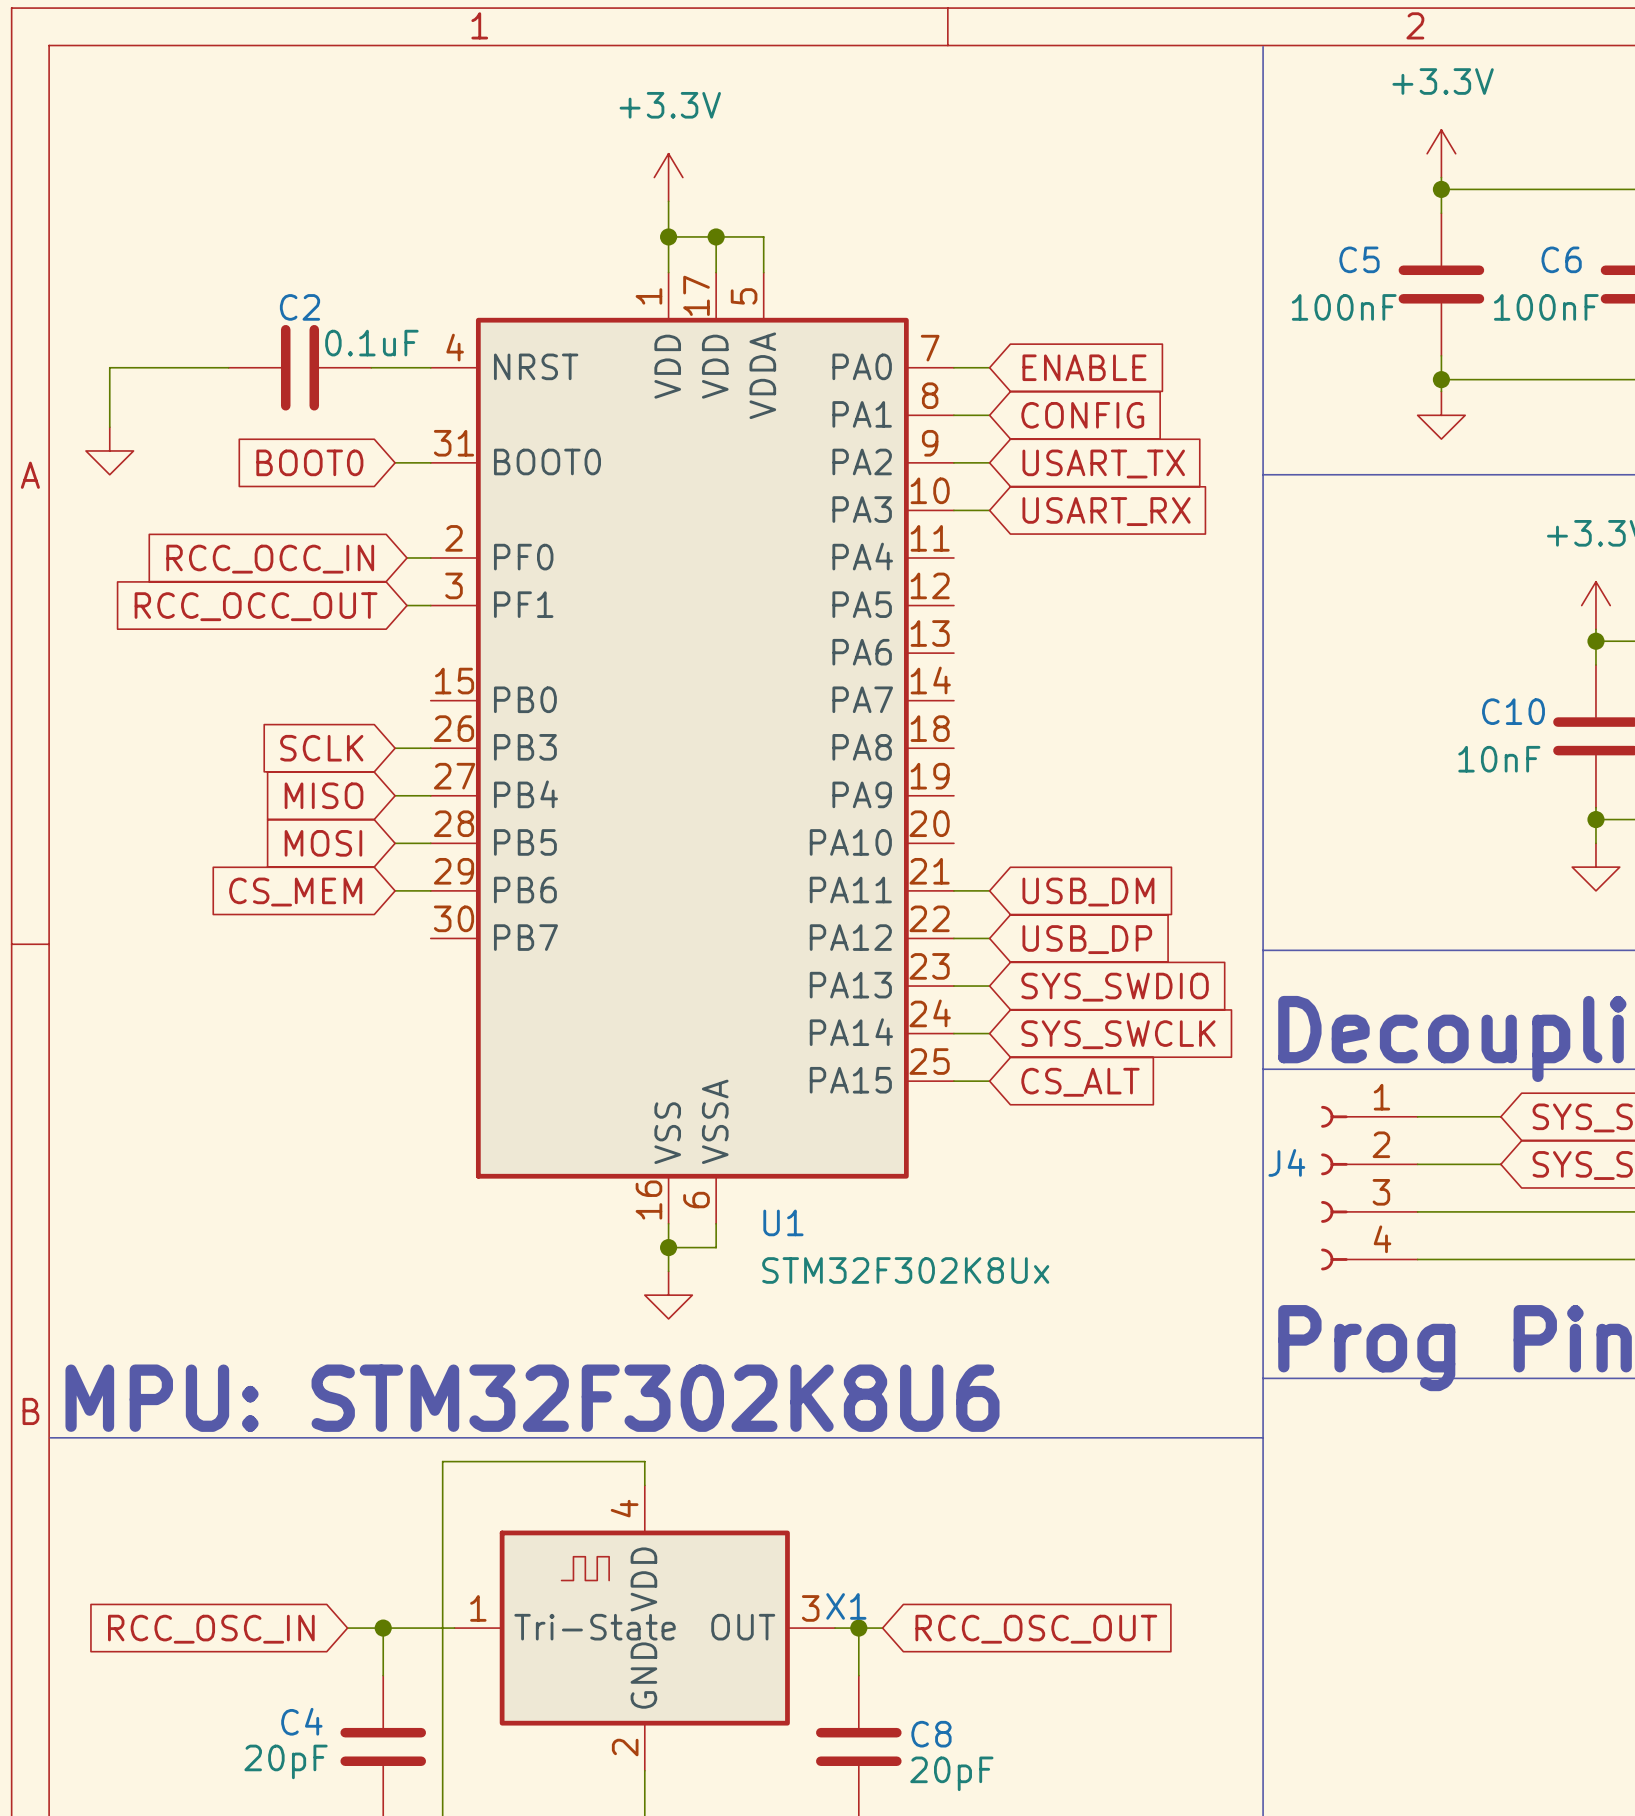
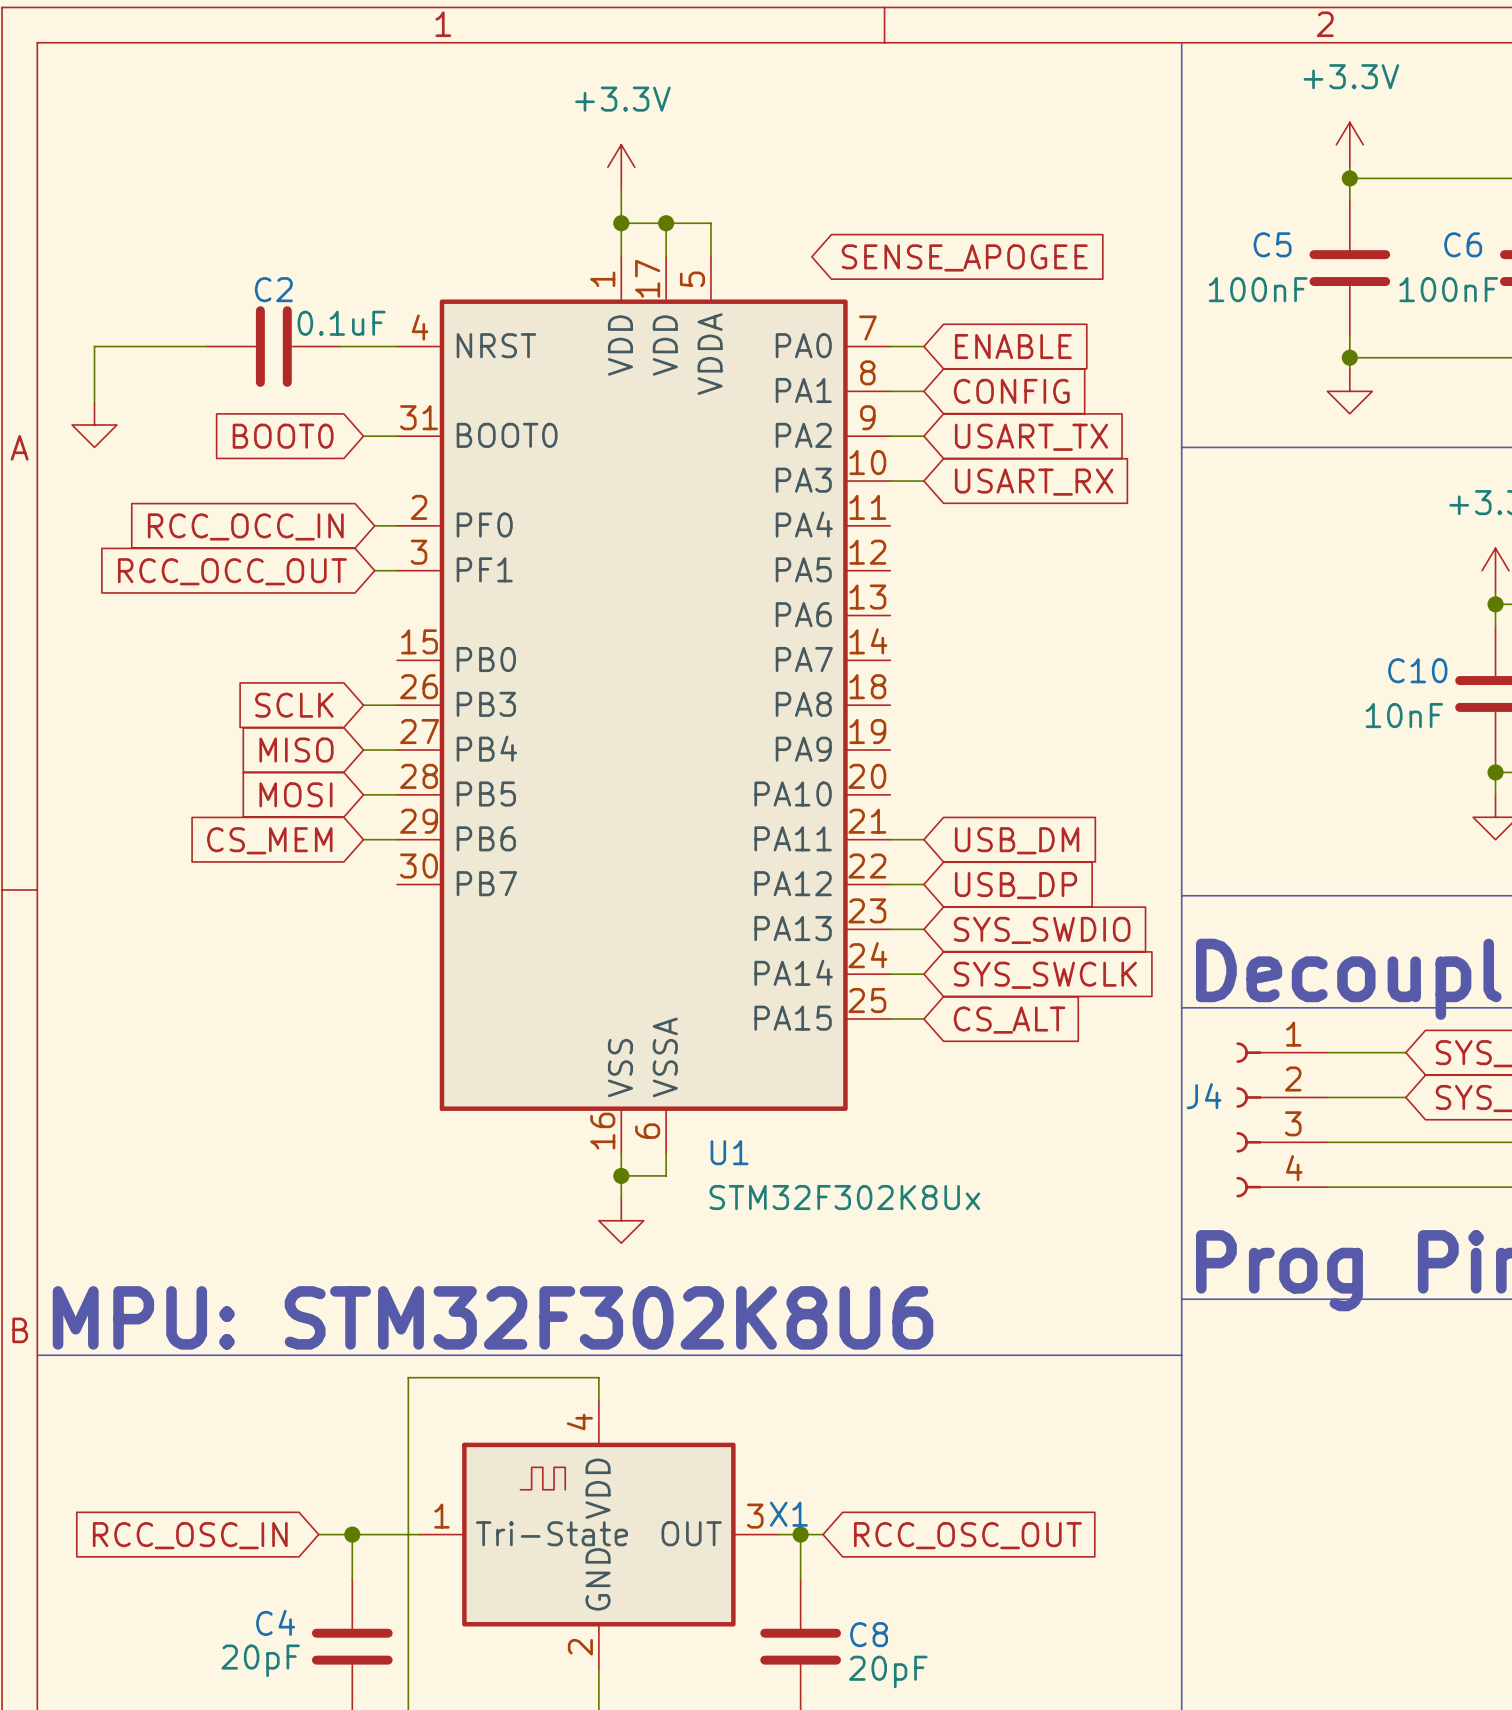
global label: none -> SENSE_APOGEE (964, 257)

